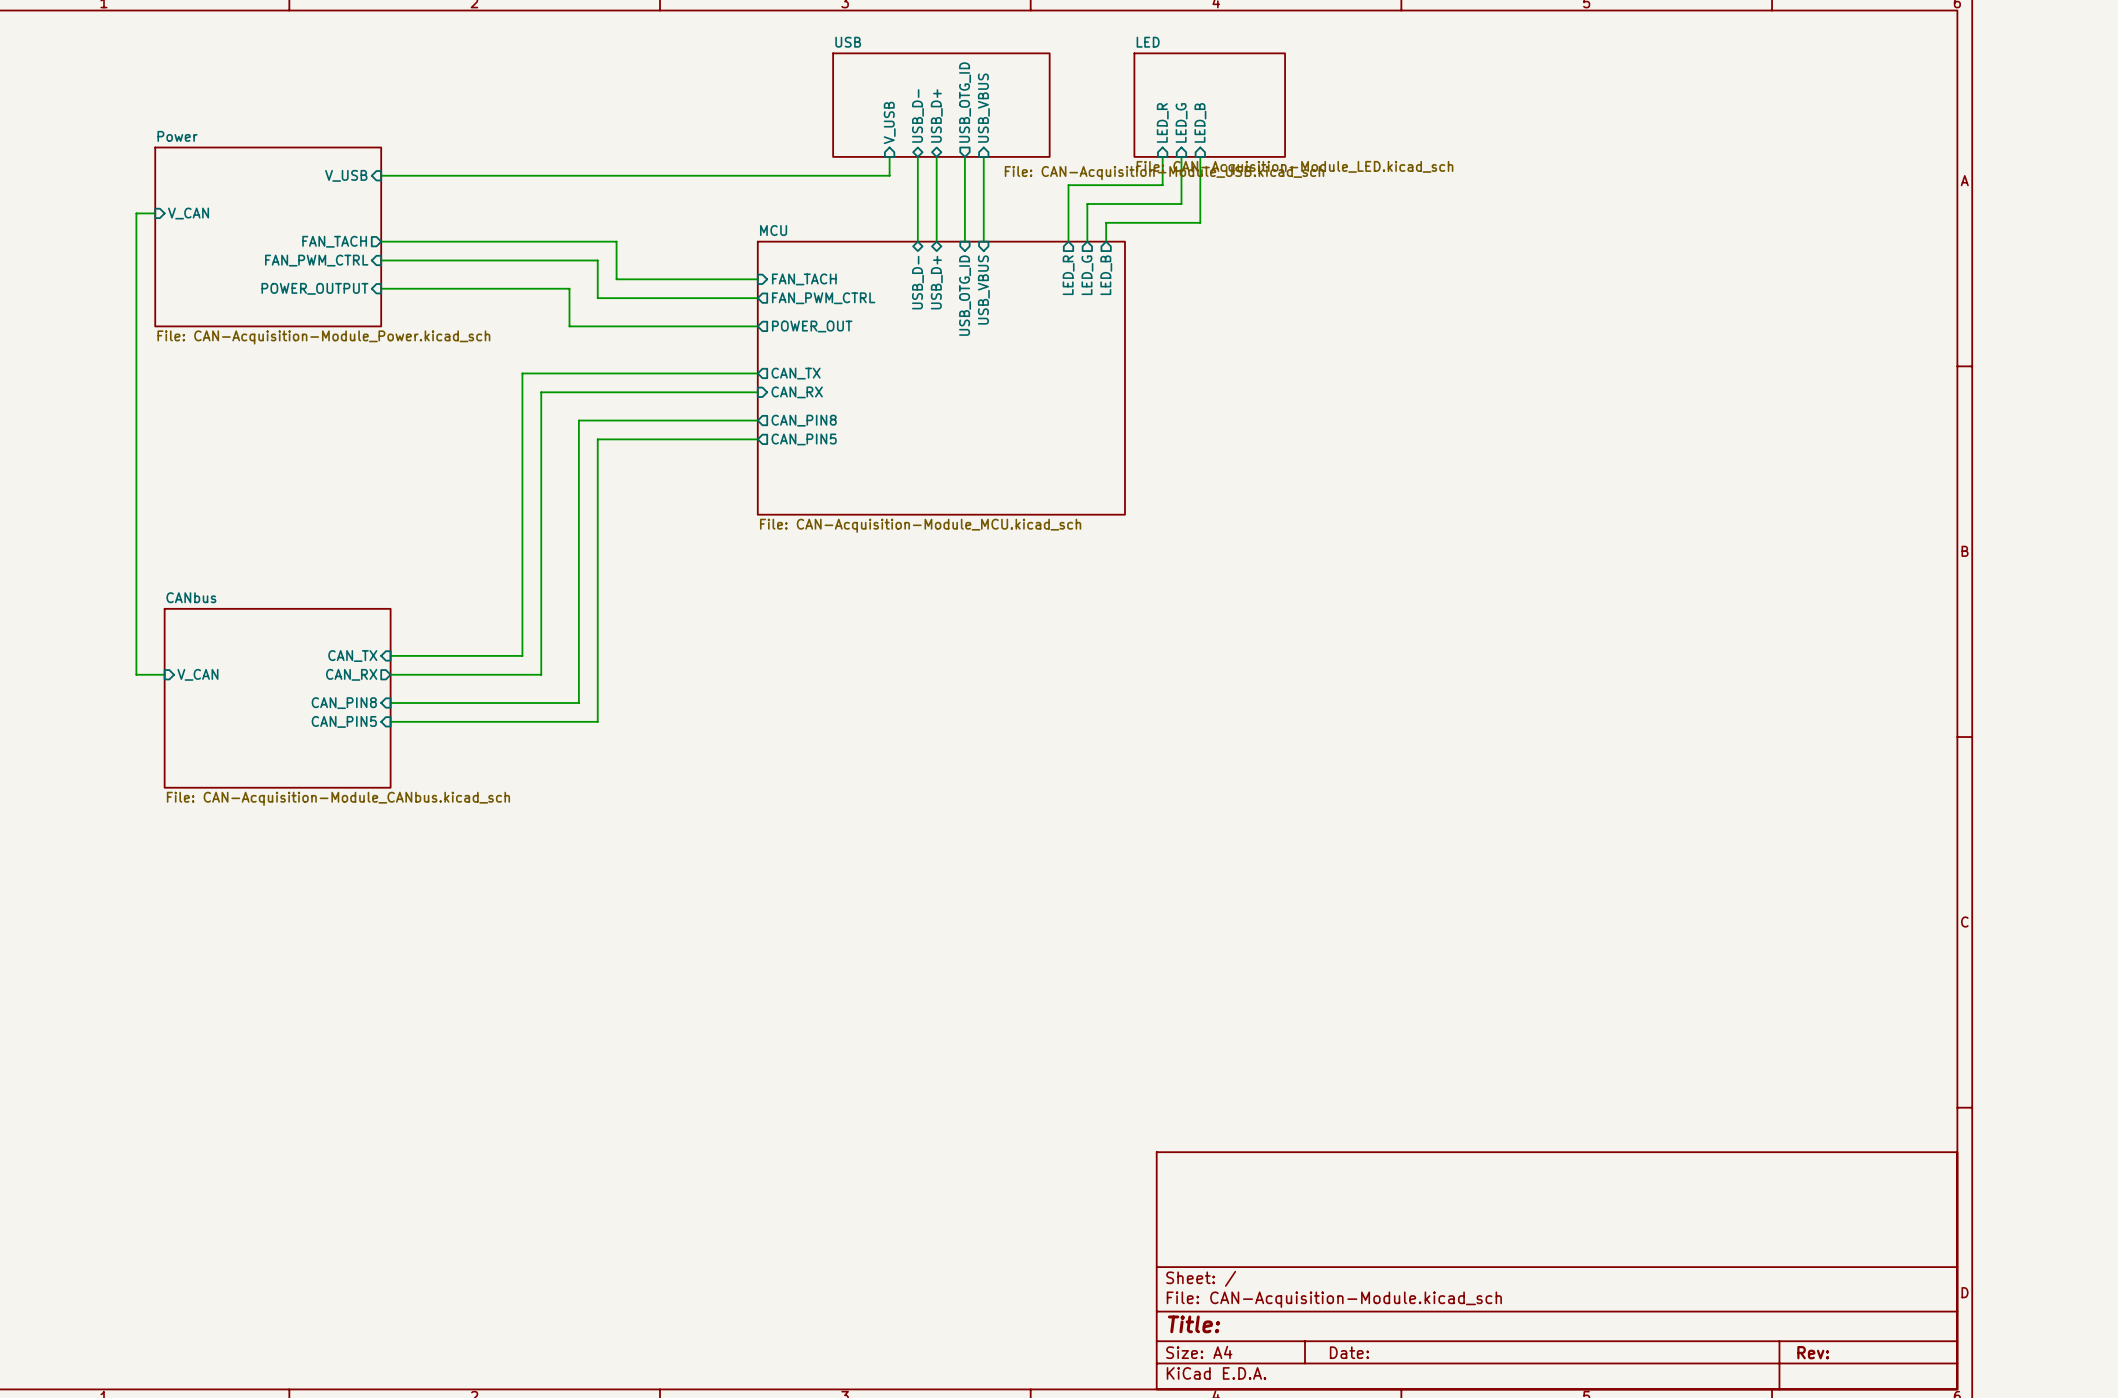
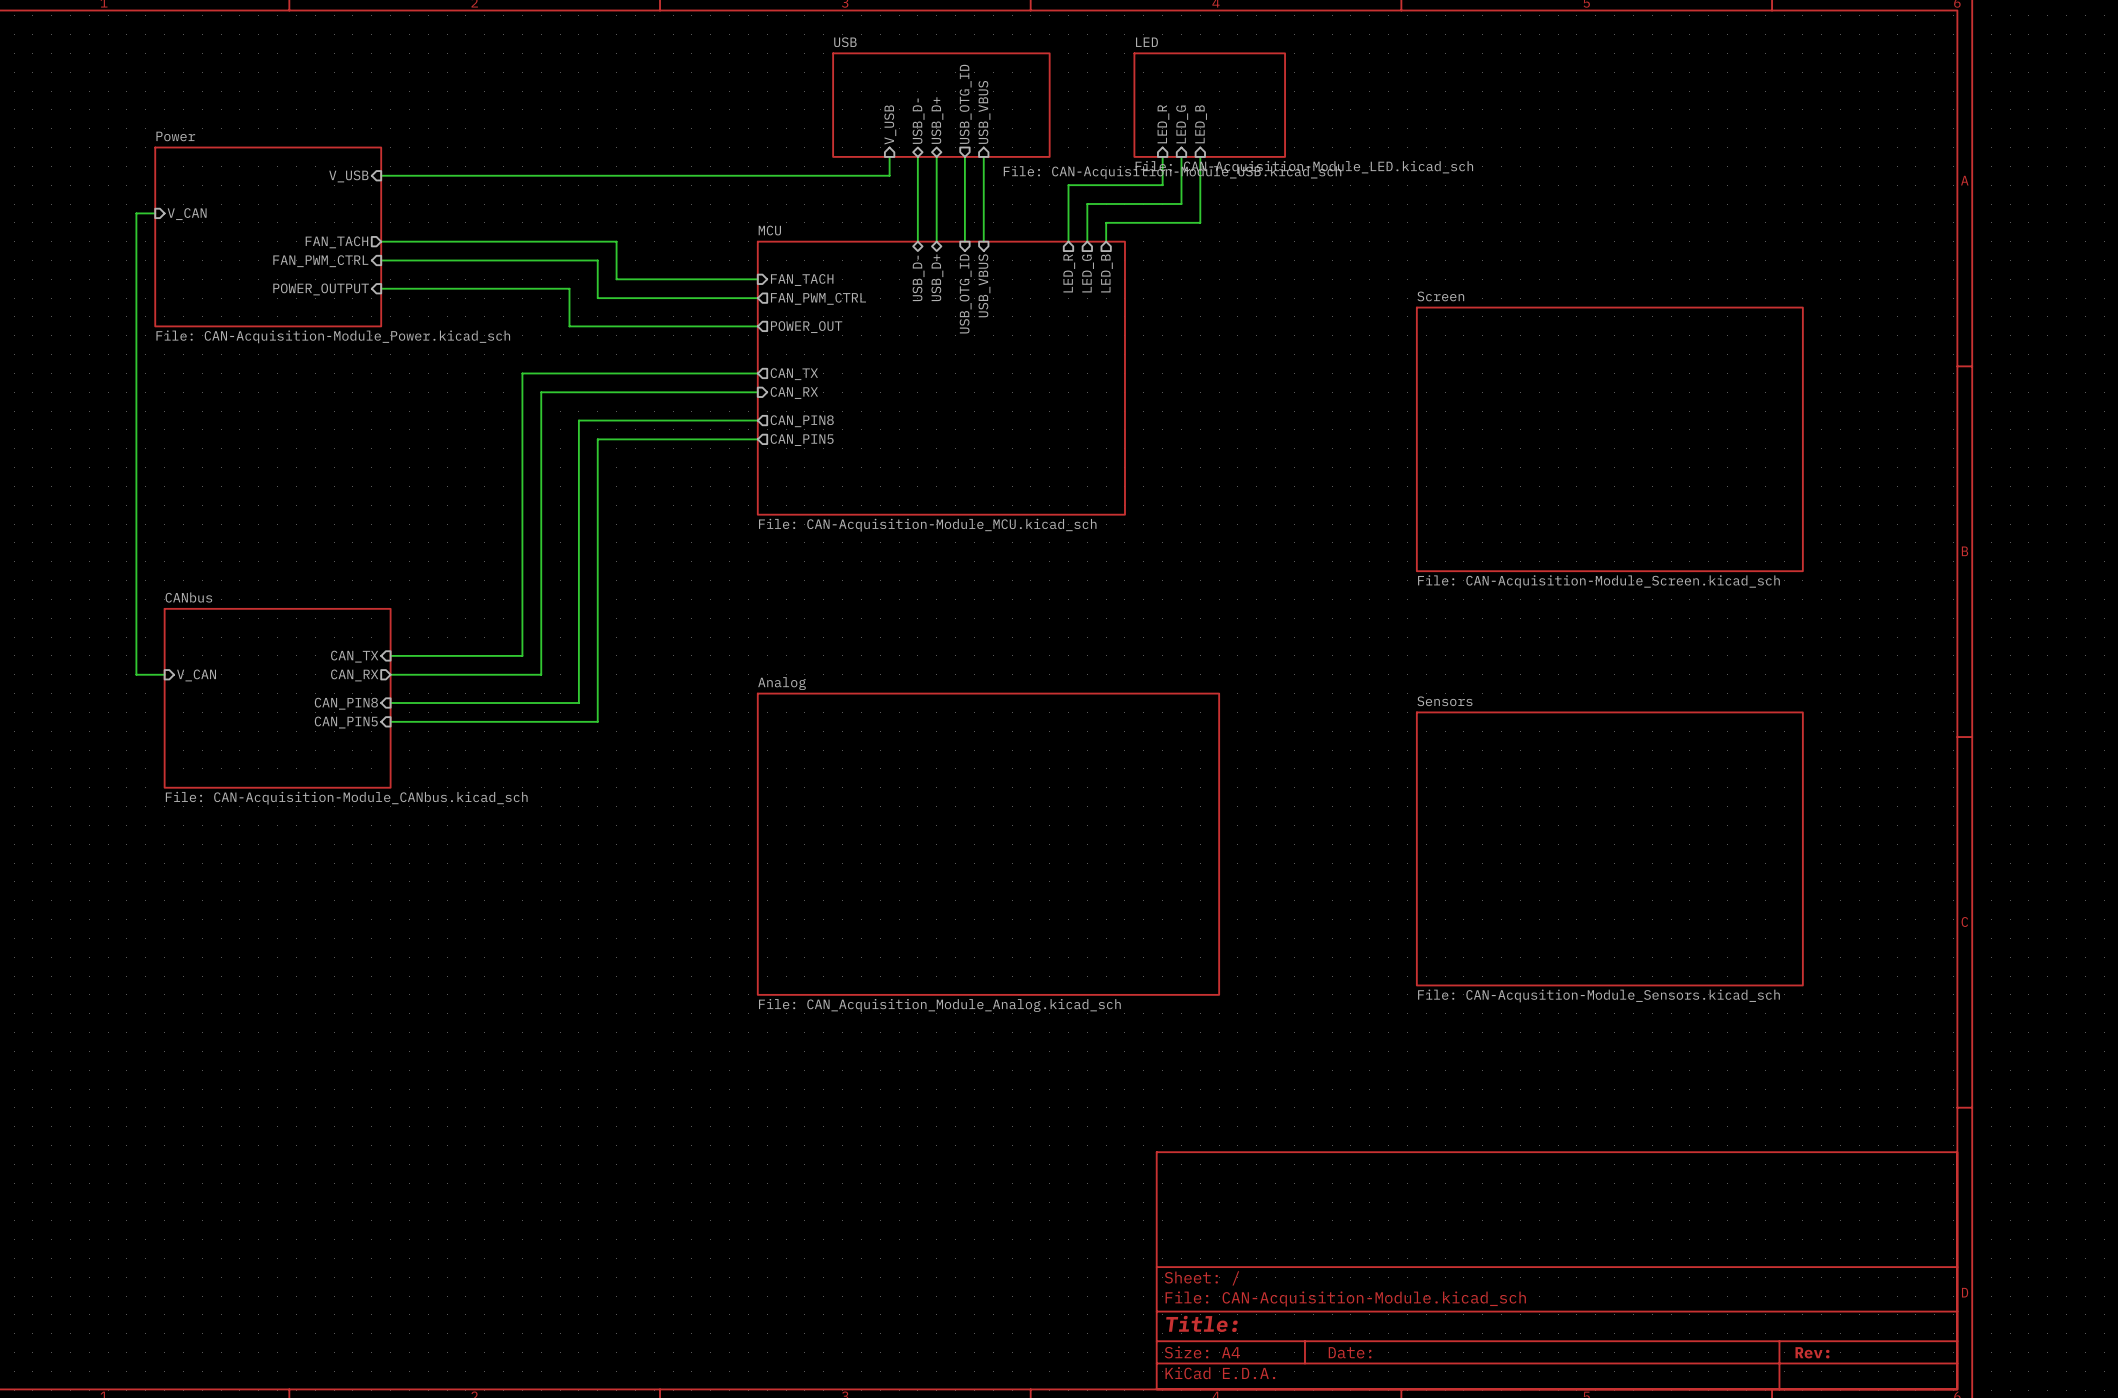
sheet Screen: none -> File: CAN-Acquisition-Module_Screen.kicad_sch (1609, 439)
sheet Analog: none -> File: CAN_Acquisition_Module_Analog.kicad_sch (988, 844)
sheet Sensors: none -> File: CAN-Acqusition-Module_Sensors.kicad_sch (1609, 848)

